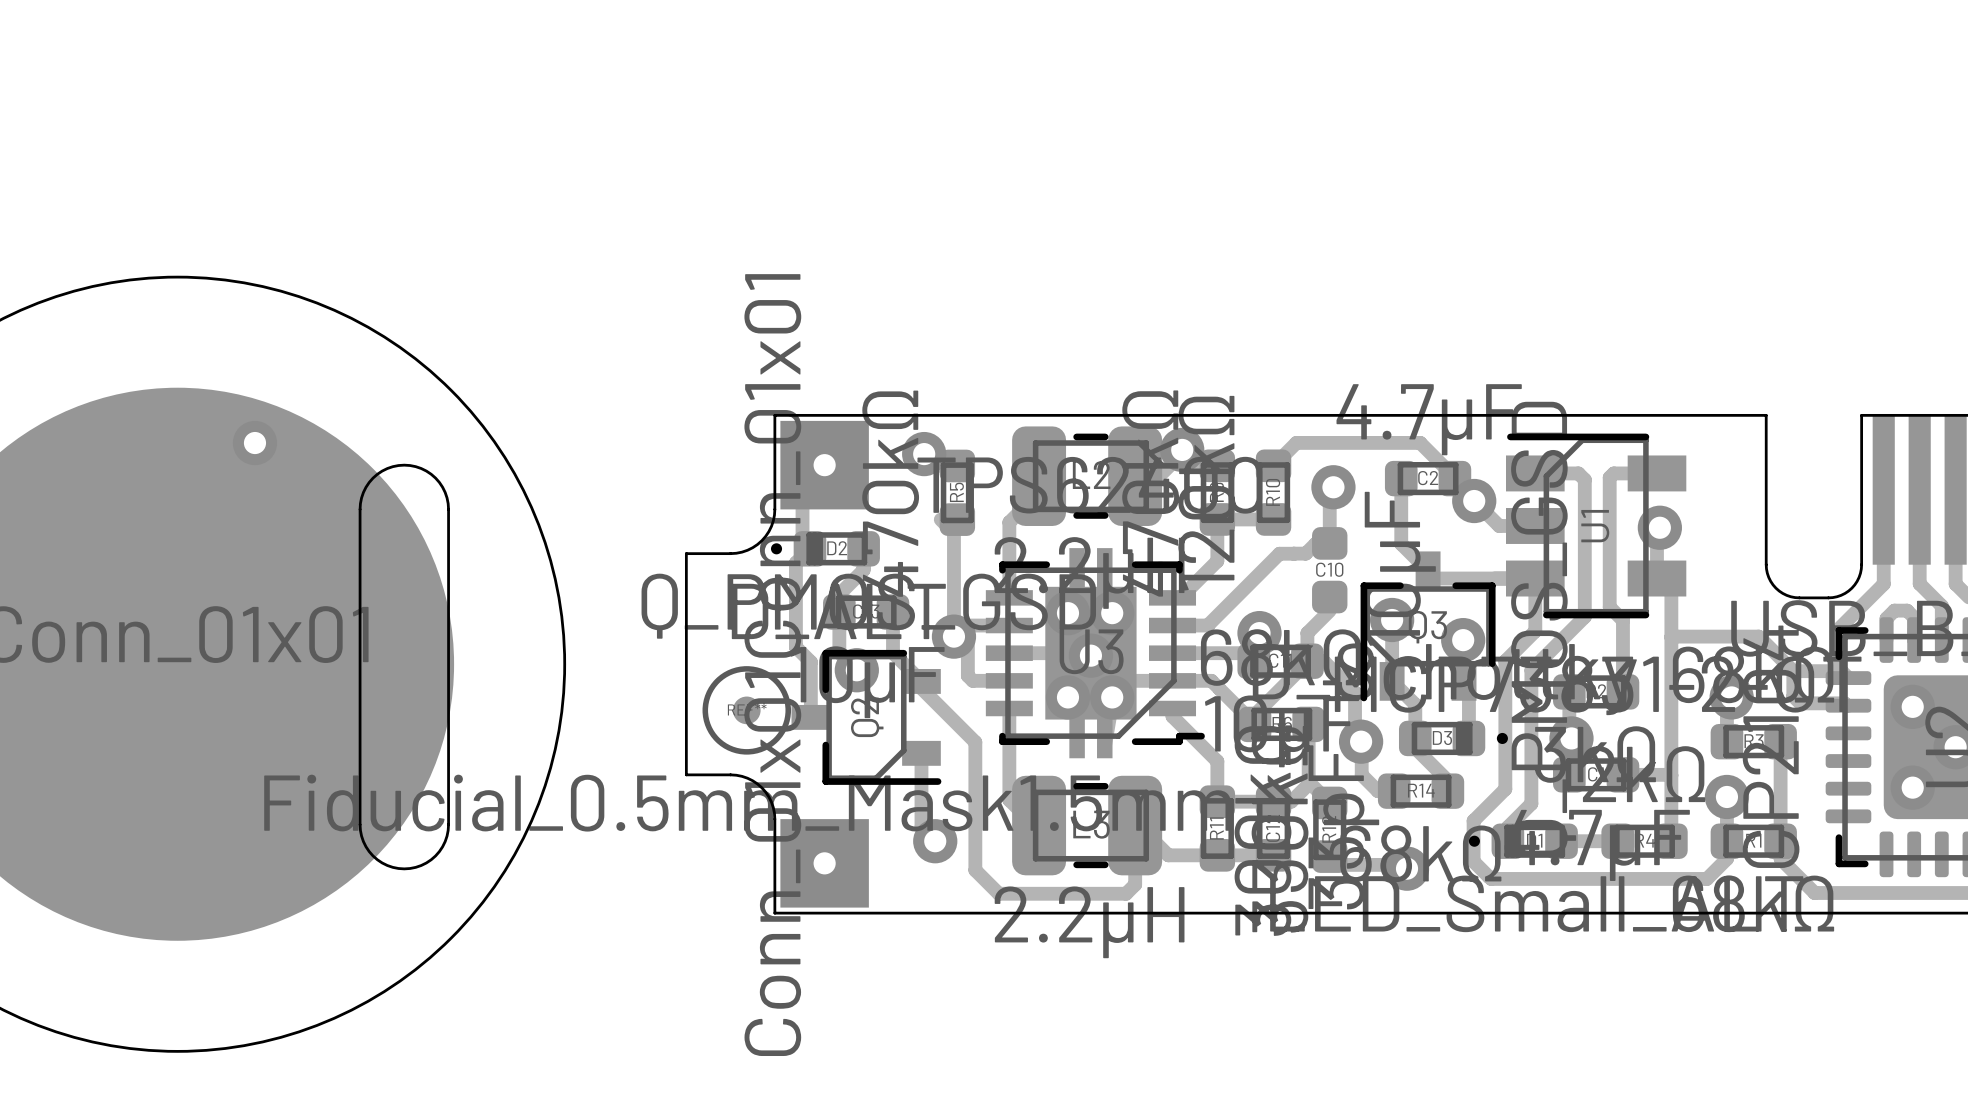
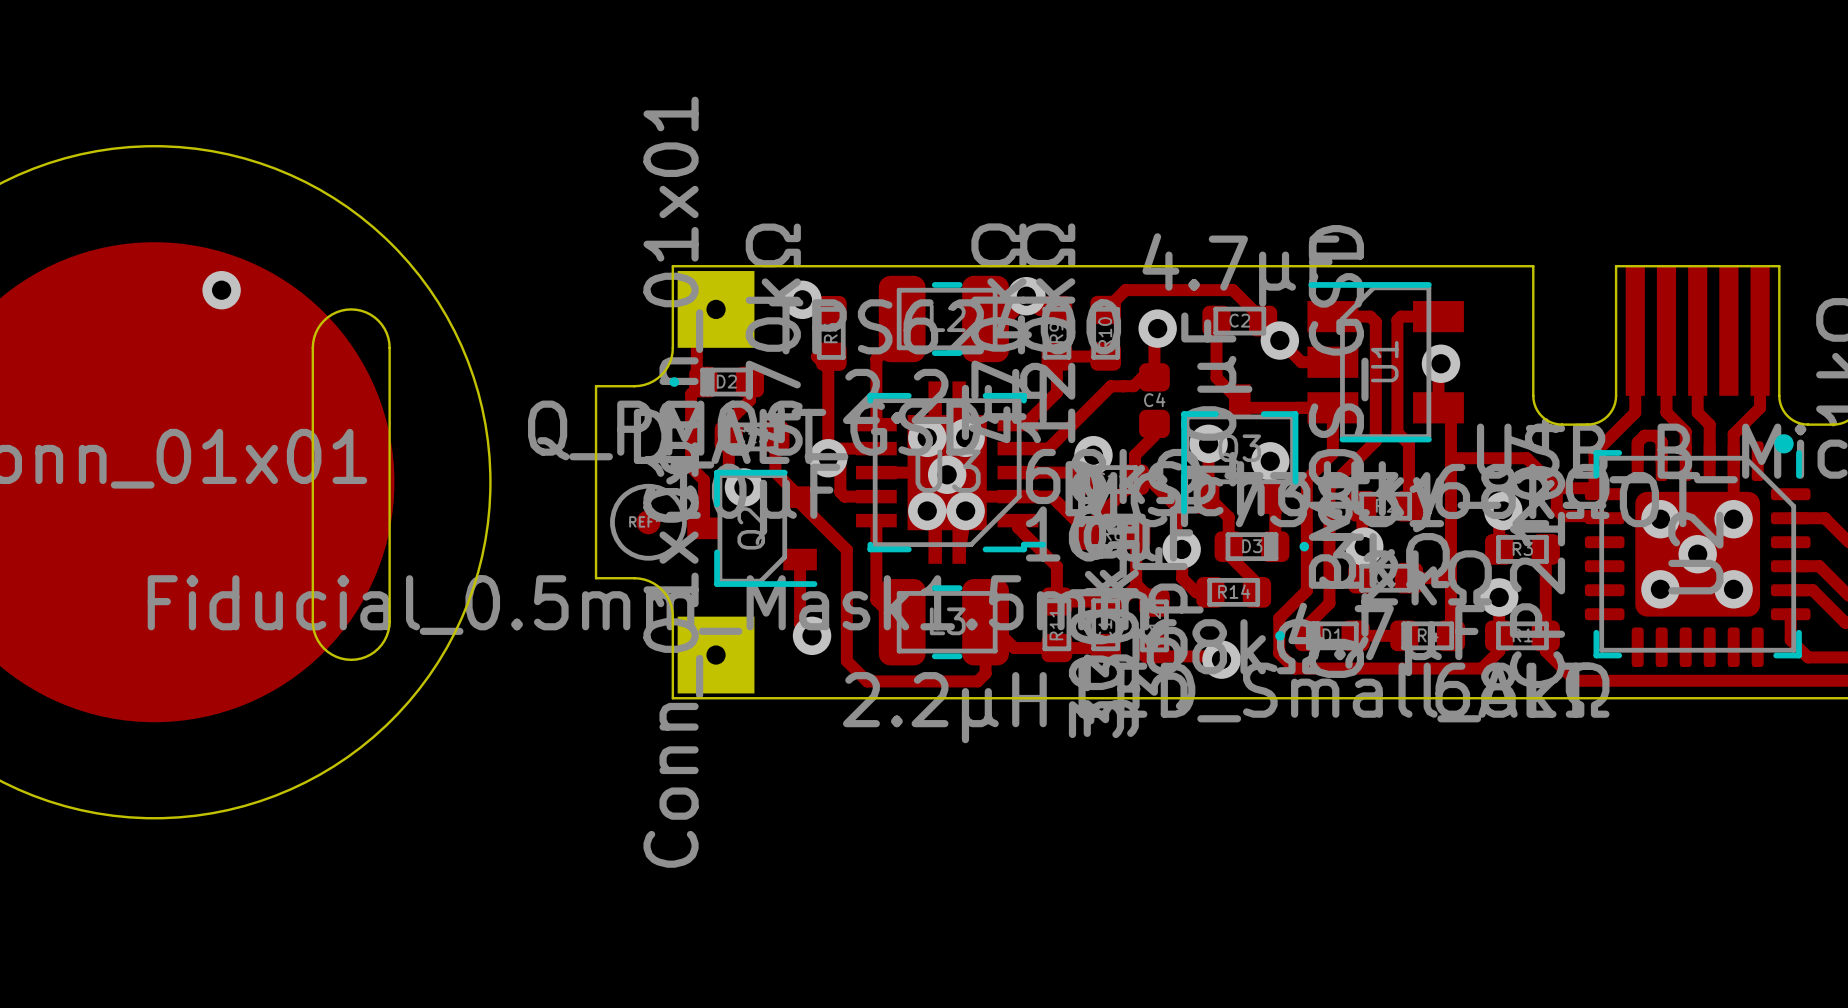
C10 name: C10 (1329, 569) -> C4 (1154, 399)

